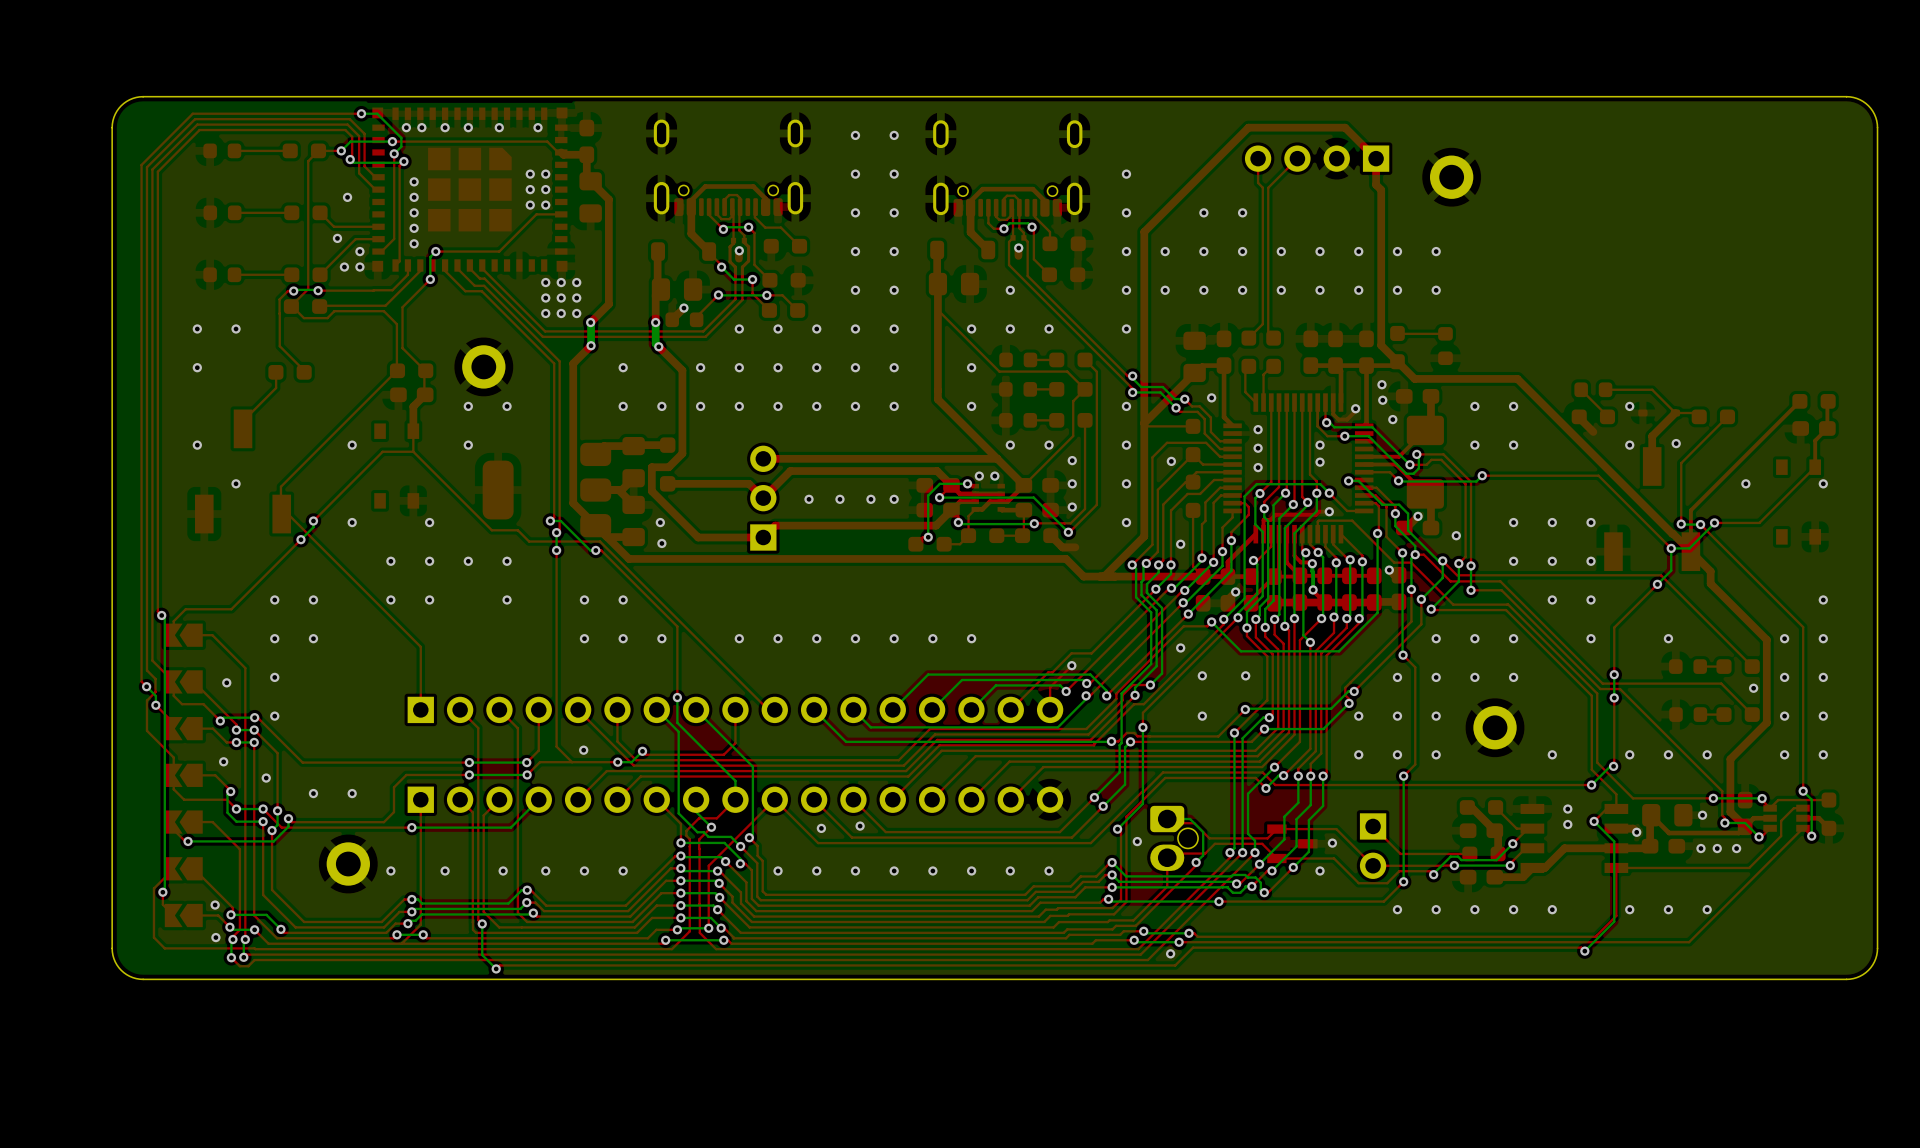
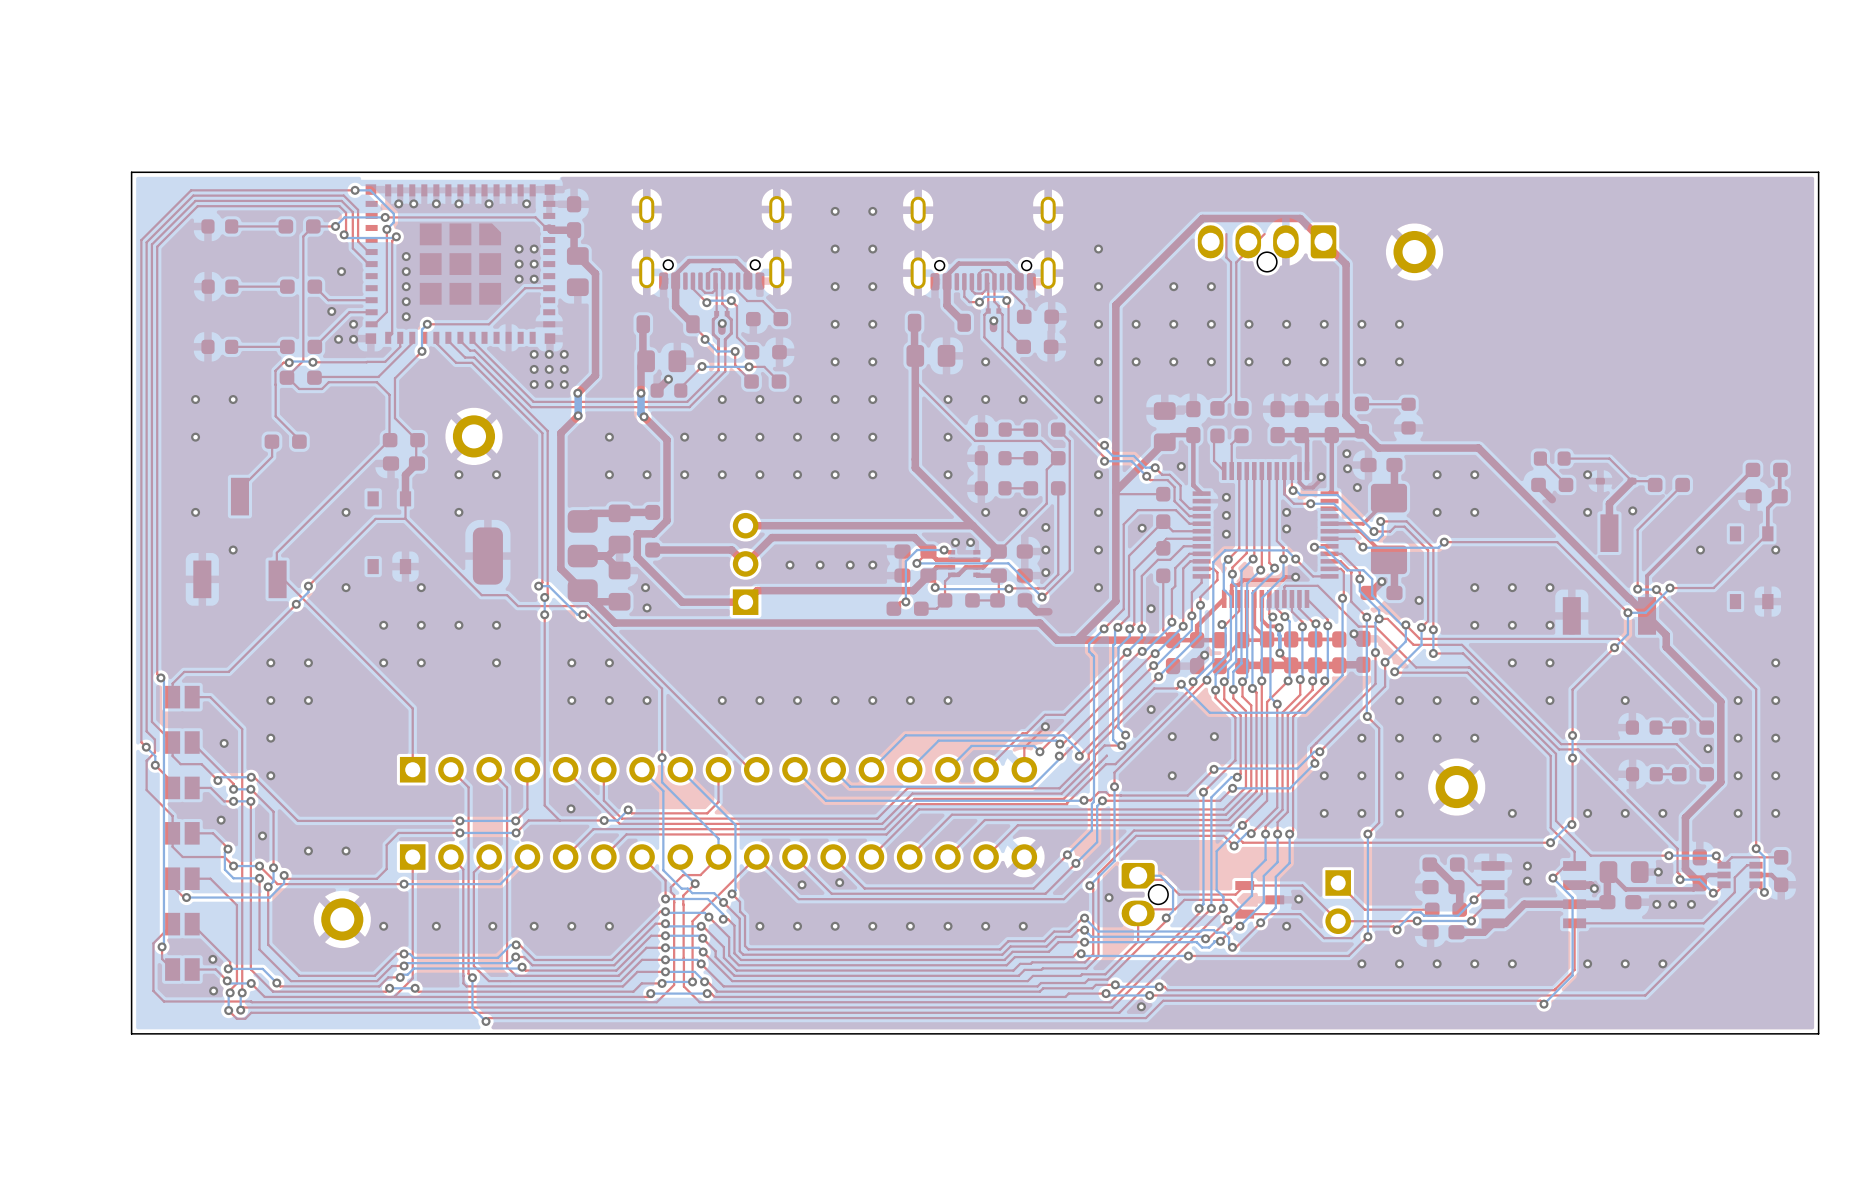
board edge: (1846, 96) (143, 96) (129, 99) (116, 111) (112, 127) (112, 948) (115, 961) (126, 974) (143, 979) (1846, 979) (1859, 976) (1872, 964) (1877, 948) (1877, 127) (1875, 117) (1868, 105) (1856, 98) (1846, 96) -> (1818, 172) (1818, 1033) (131, 1033) (131, 172) (1818, 172)
top track: (1233, 142) (1248, 127) (1345, 127) (1376, 158) (1376, 184) -> (1202, 218) (1300, 218) (1341, 259)
part: (1317, 158) -> none
part: none -> (1267, 248)
bottom track: (1132, 564) (1136, 568) (1136, 597) (1151, 612) (1151, 663) (1121, 693) (1121, 738) -> (1092, 655) (1094, 656) (1094, 797)
bottom track: none -> (1104, 628) (1089, 643) (1089, 651) (1092, 654)
bottom track: (1146, 592) (1162, 607) (1162, 673) (1150, 685) -> (1118, 655) (1118, 727) (1125, 735)
bottom track: (1141, 595) (1156, 610) (1156, 666) (1135, 687) (1135, 695) -> (1113, 658) (1113, 739) (1117, 744)
part footprint: [164, 623, 203, 647] -> [165, 685, 200, 709]
part footprint: [164, 670, 203, 694] -> [165, 731, 200, 754]
via position: (1135, 695) -> (1125, 735)
part footprint: [164, 717, 203, 741] -> [165, 776, 200, 800]
part footprint: [164, 763, 203, 787] -> [165, 822, 200, 845]
part footprint: [164, 810, 203, 834] -> [165, 867, 200, 891]
part footprint: [164, 857, 203, 881] -> [165, 912, 200, 936]
part footprint: [164, 903, 203, 928] -> [165, 958, 200, 981]

